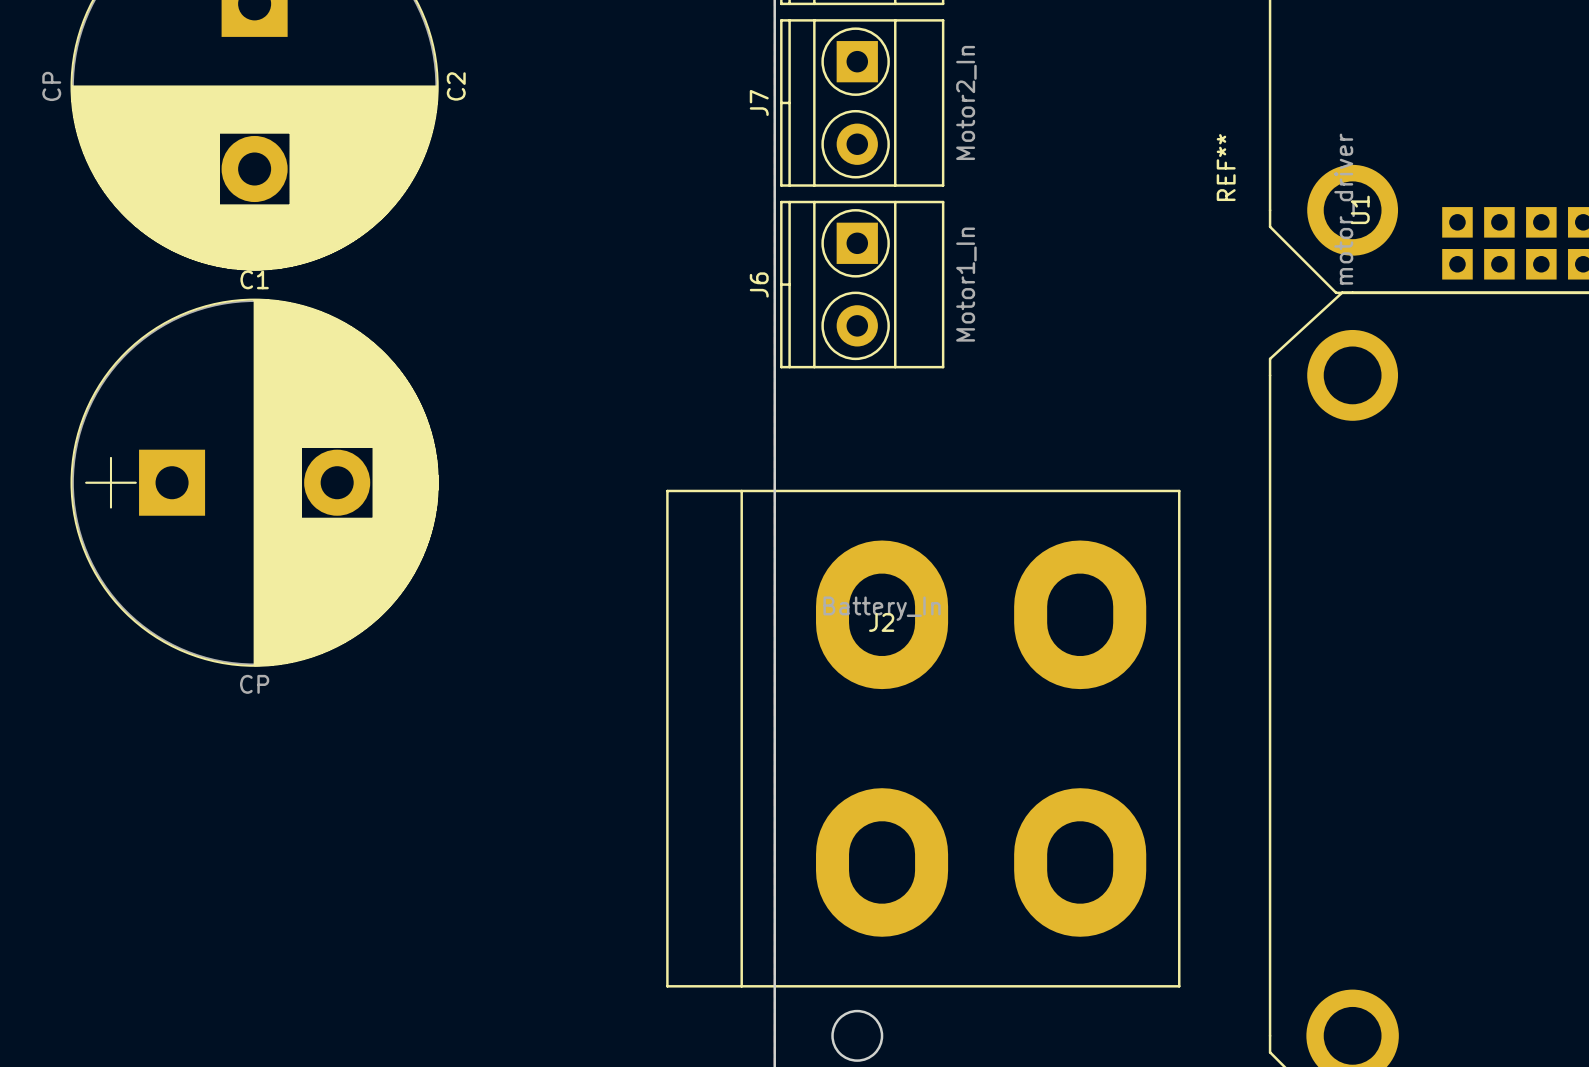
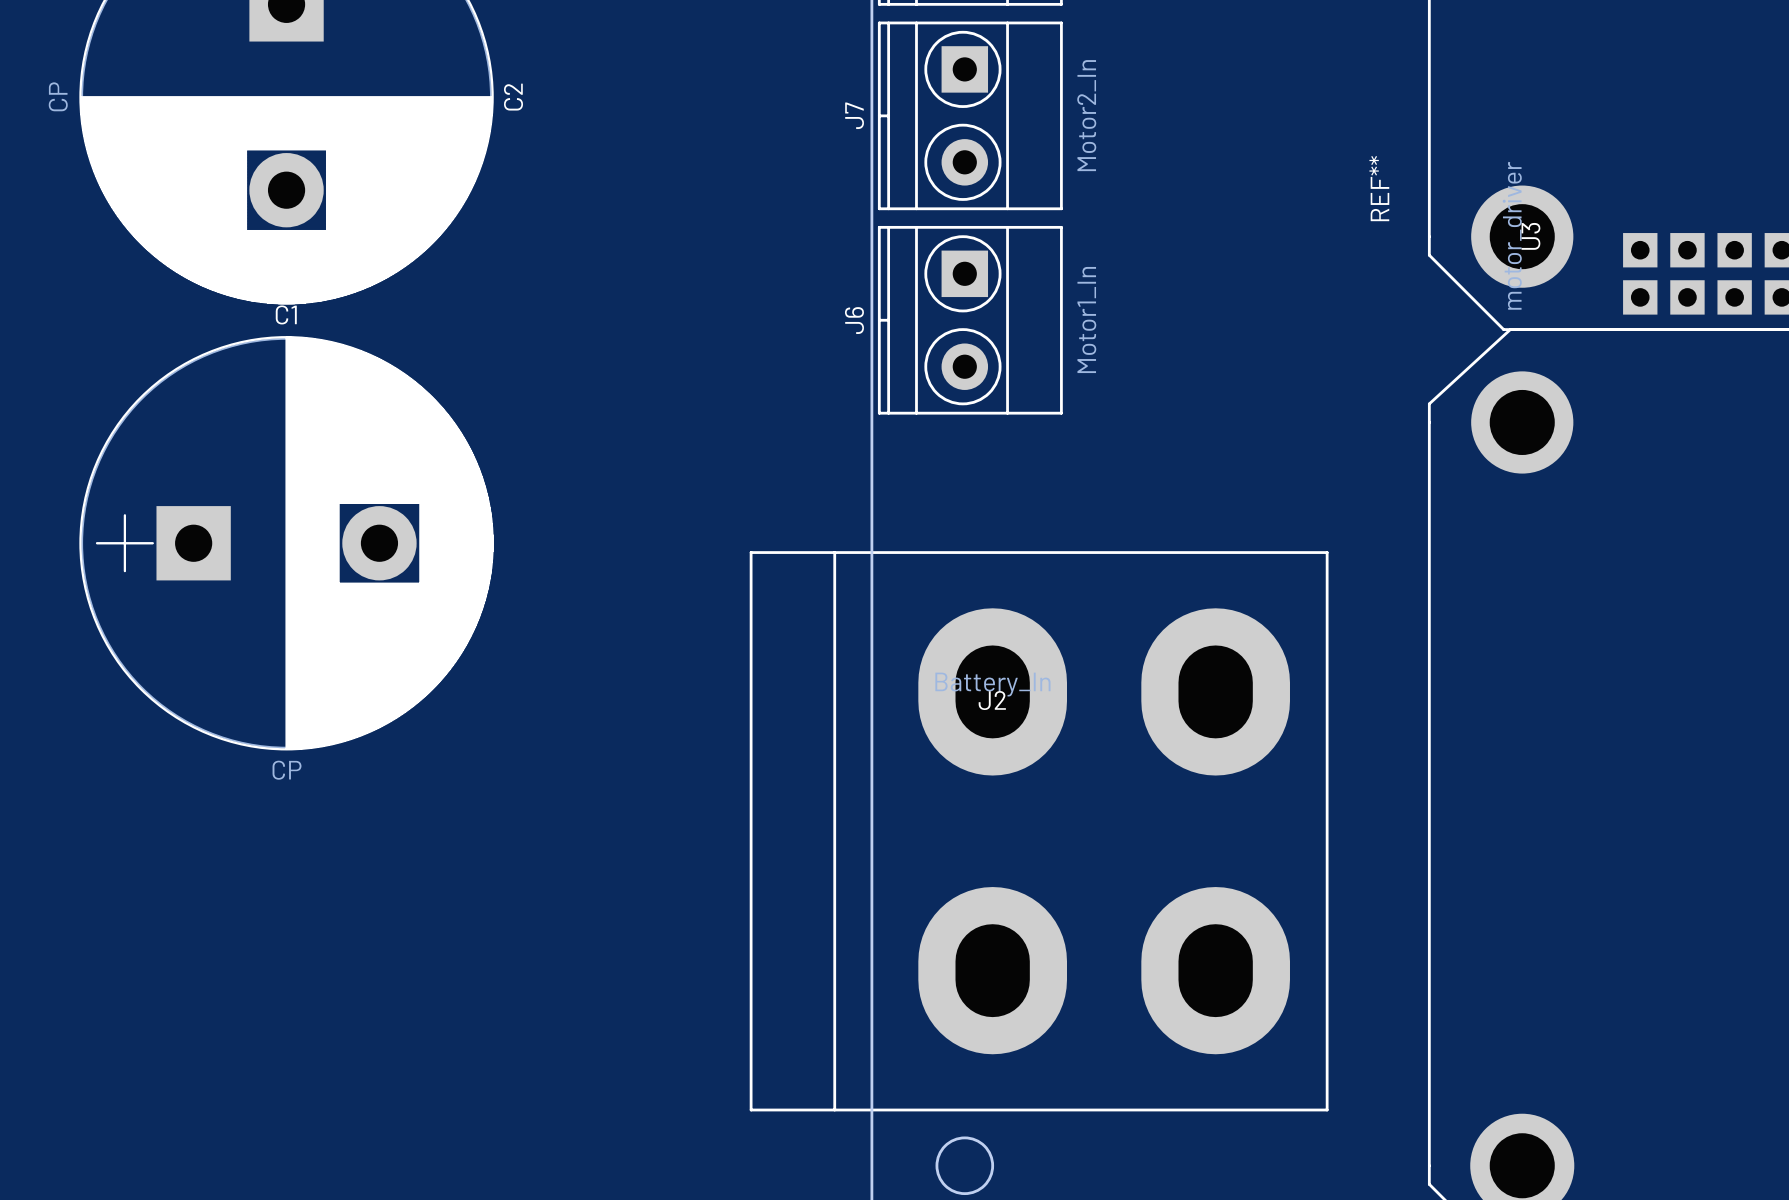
U1 name: U1 (1360, 209) -> U3 (1530, 236)

